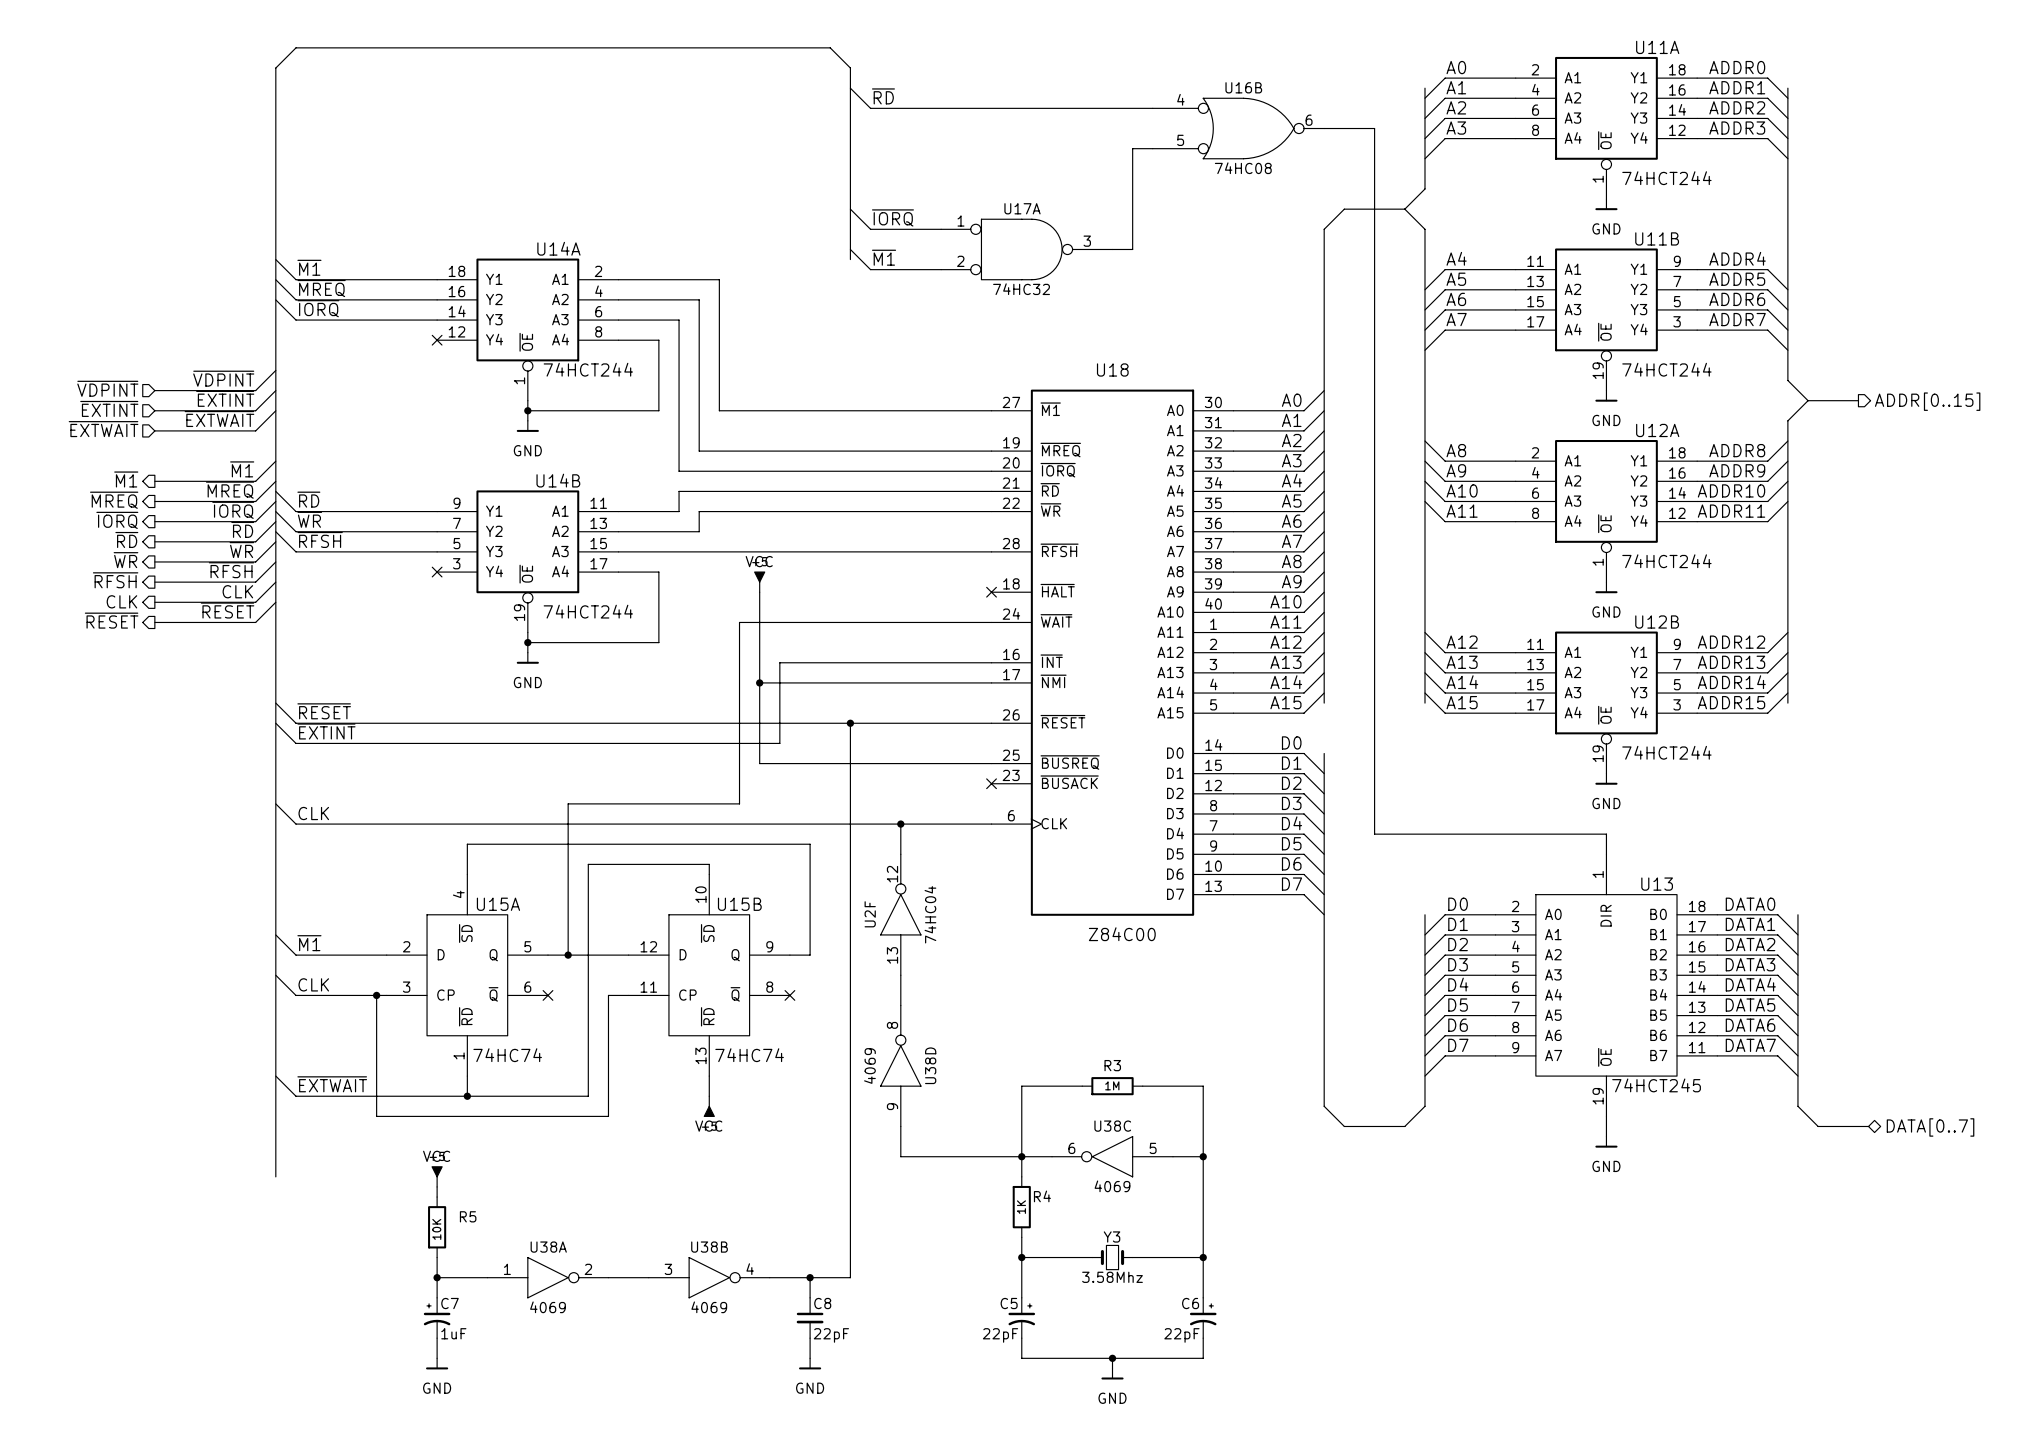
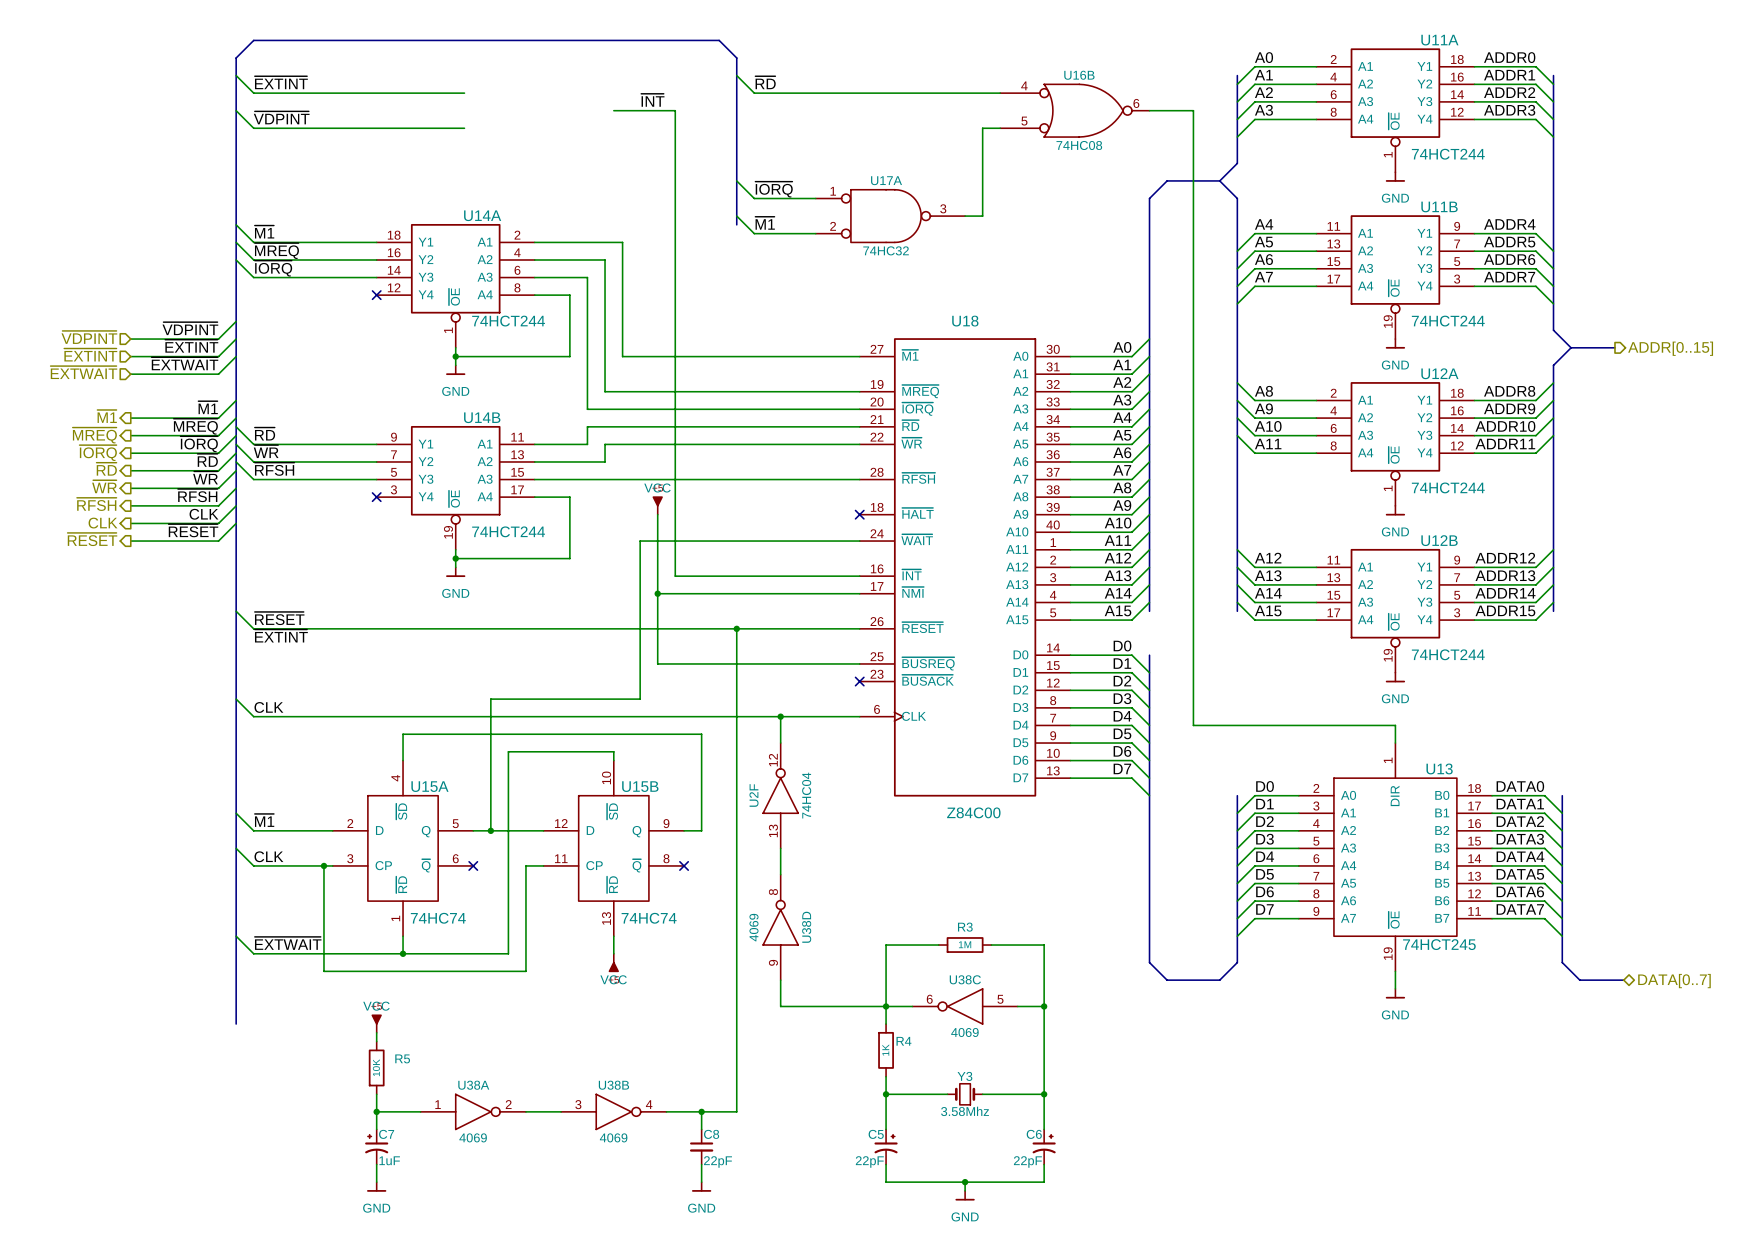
wire: none -> (236, 75) (253, 93) (464, 93)
label: none -> ~{EXTINT} (281, 82)
label: none -> ~{INT} (652, 100)
wire: none -> (236, 110) (253, 128) (464, 128)
label: none -> ~{VDPINT} (281, 117)
wire: (779, 662) (779, 743) (295, 743) (275, 723) -> (675, 576) (675, 110) (613, 110)

